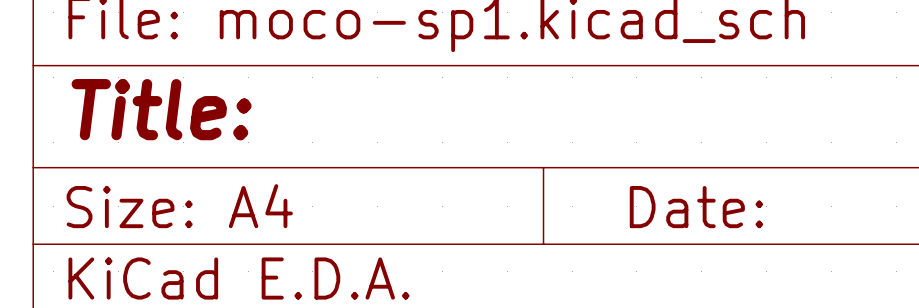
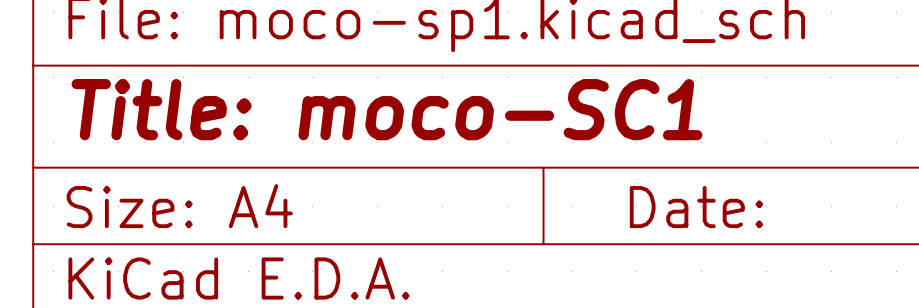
title block: Title: (161, 109) -> Title: moco-SC1 (386, 109)

